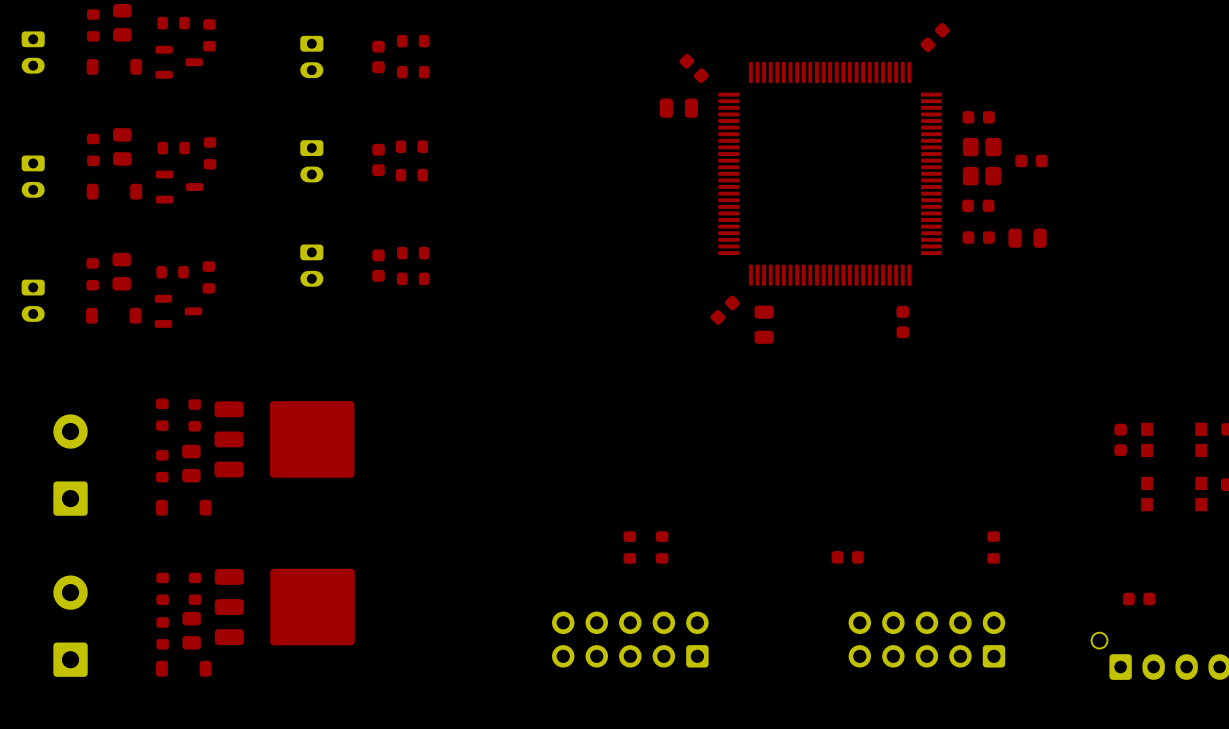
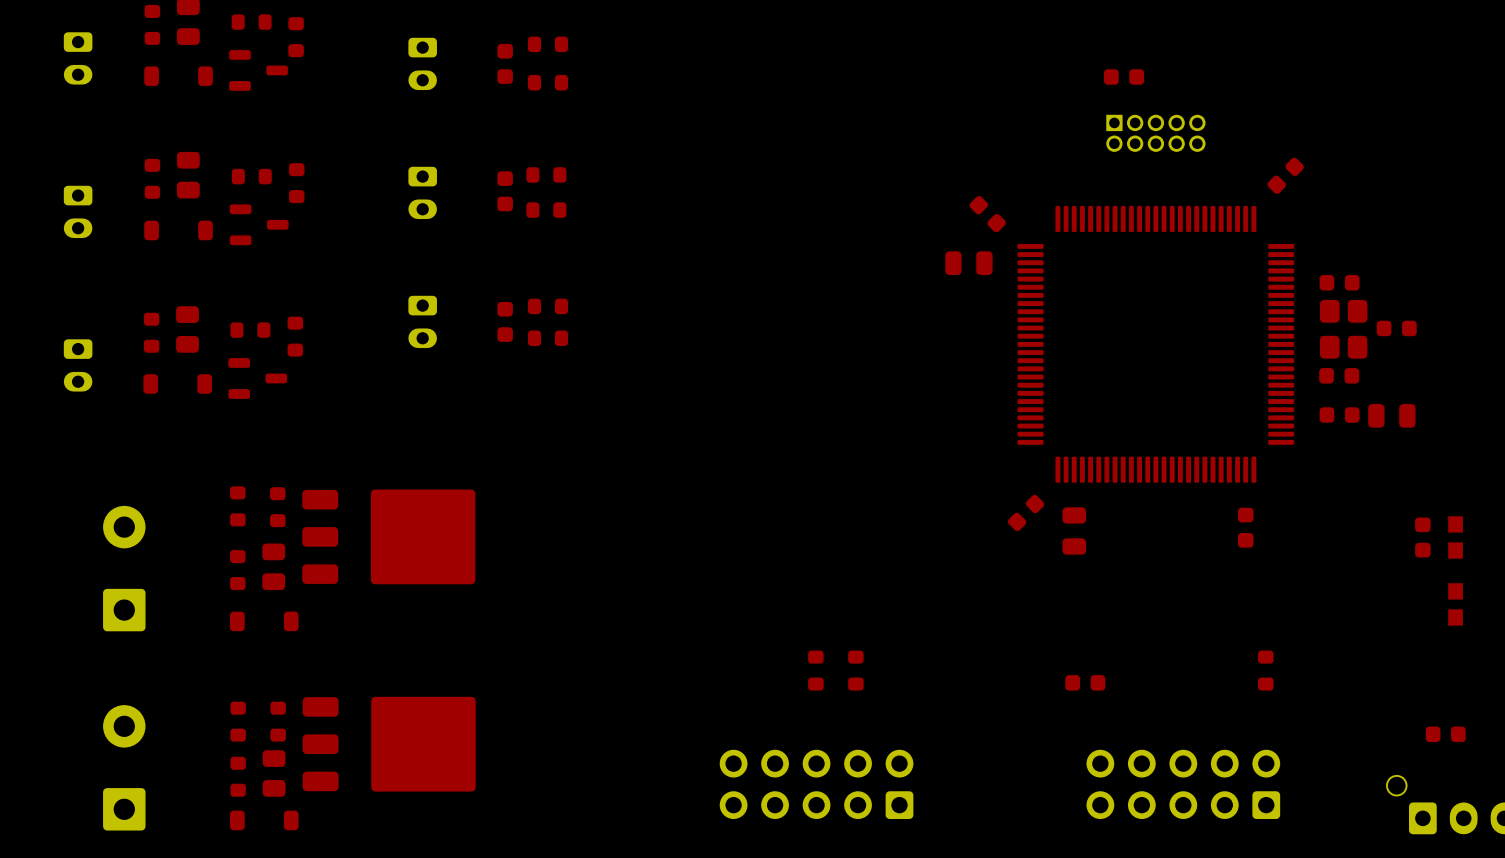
part: (935, 37) -> none
part: none -> (1124, 76)
part: (694, 68) -> none
part: (678, 108) -> none
part: none -> (1155, 133)
part: (978, 117) -> none
part: none -> (1285, 175)
part: (1031, 160) -> none
part position: (981, 161) -> (1343, 329)
part position: (830, 173) -> (1155, 344)
part: none -> (987, 214)
part: (978, 205) -> none
part: none -> (968, 263)
part: none -> (1339, 282)
part: (978, 237) -> none
part position: (1027, 238) -> (1391, 415)
part: none -> (1396, 328)
part: none -> (1339, 375)
part: (725, 310) -> none
part: (902, 322) -> none
part: (764, 324) -> none
part: none -> (1339, 415)
part: none -> (1026, 512)
part: none -> (1245, 527)
part: none -> (1074, 530)

